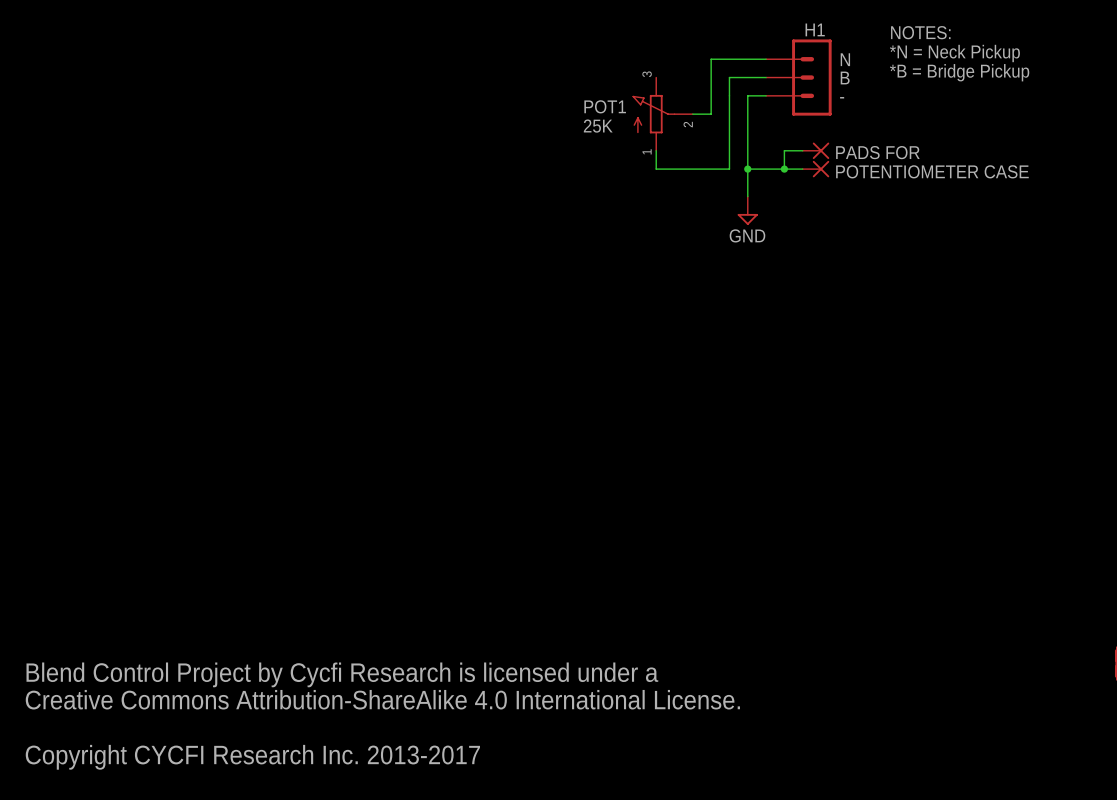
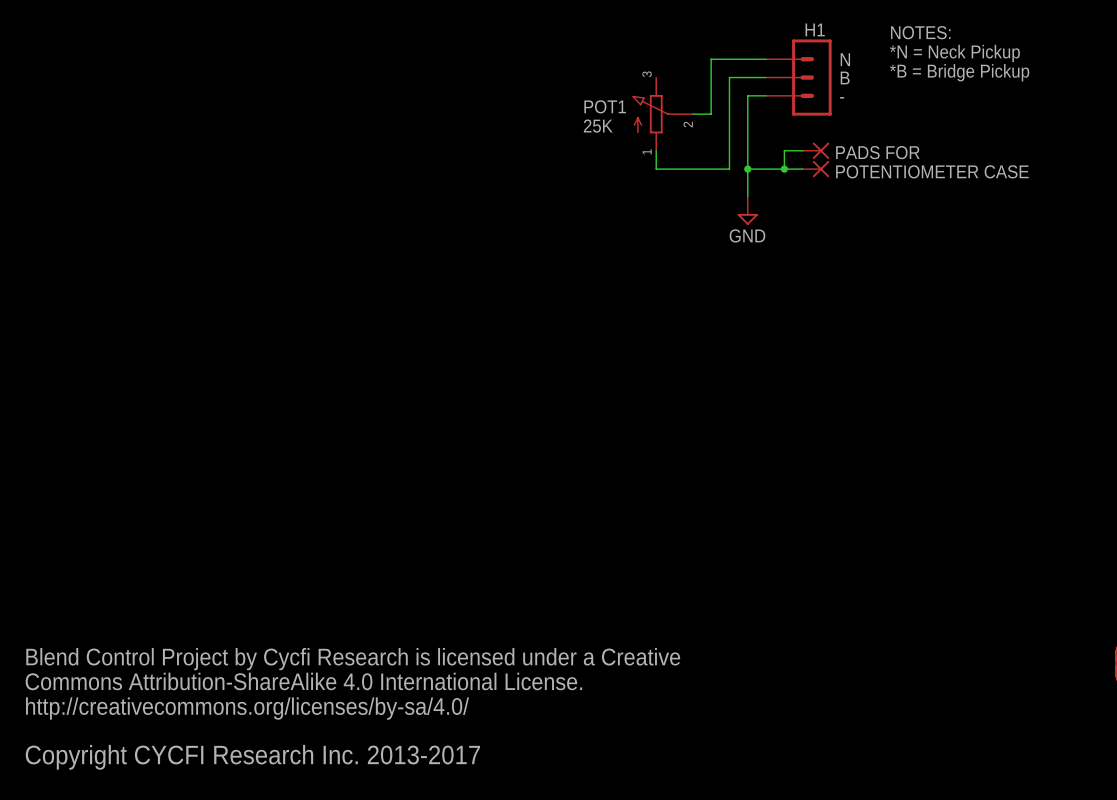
text: Blend Control Project by Cycfi Research is licensed under a (342, 674) -> Blend Control Project by Cycfi Research is licensed under a Creative (353, 659)
text: none -> Commons Attribution-ShareAlike 4.0 International License. (303, 681)
text: Creative Commons Attribution-ShareAlike 4.0 International License. (382, 699) -> http://creativecommons.org/licenses/by-sa/4.0/ (247, 708)

